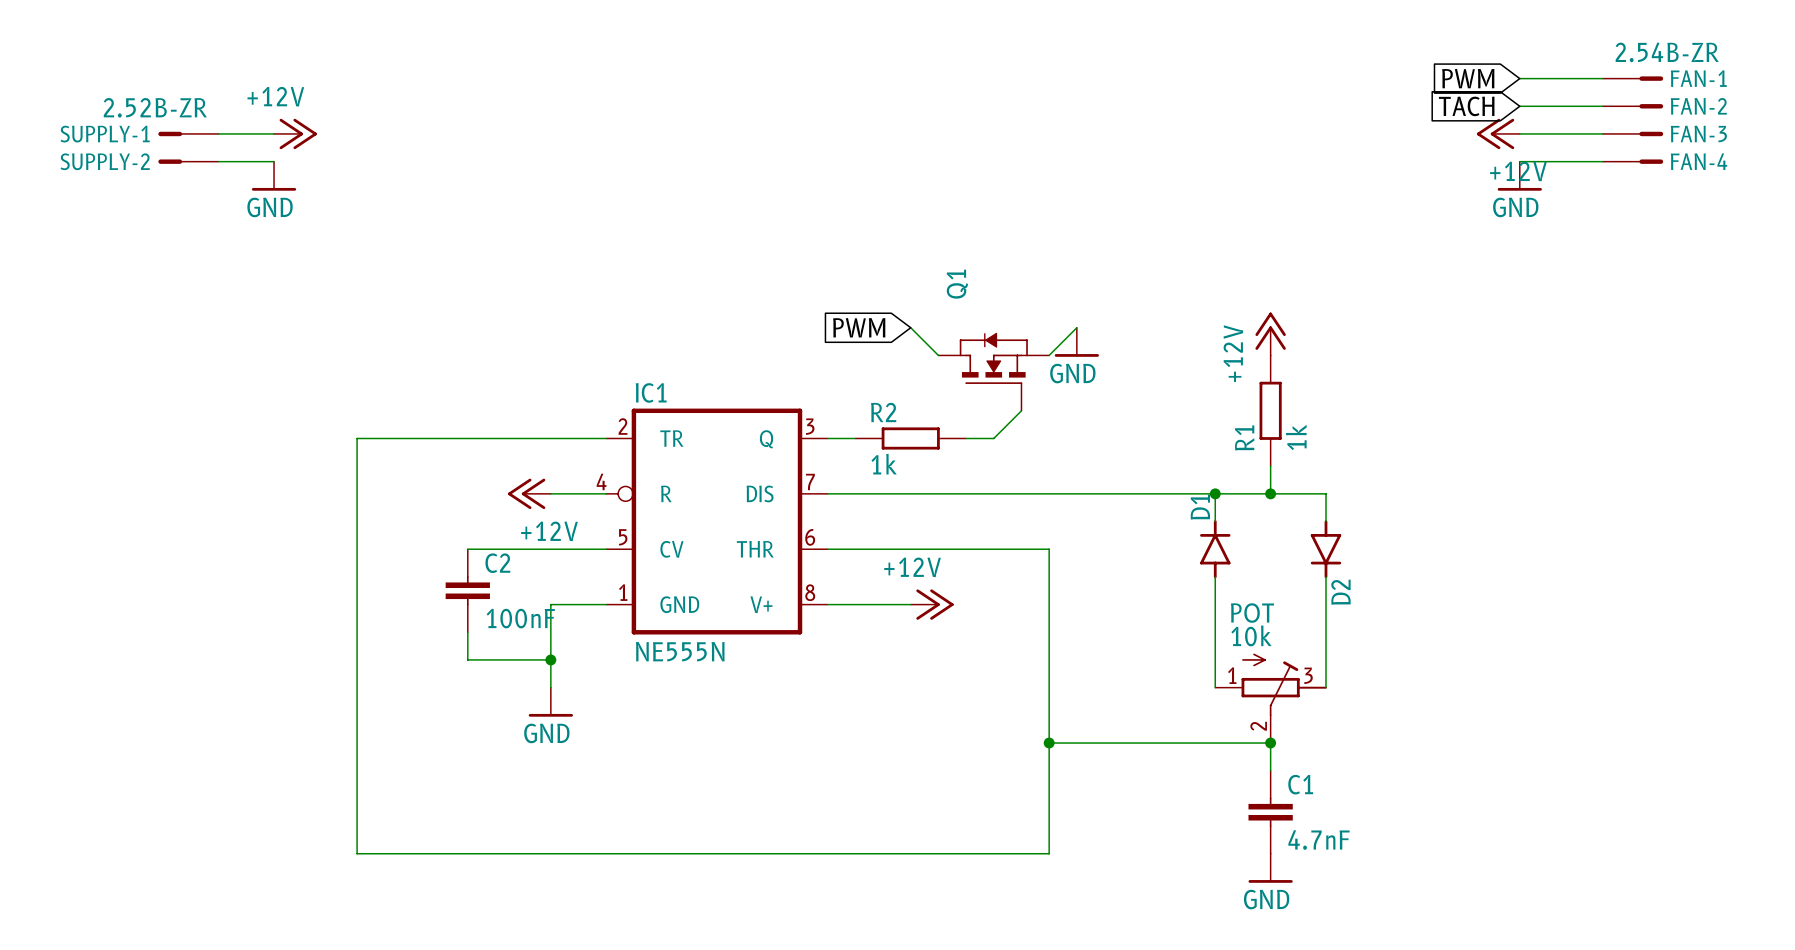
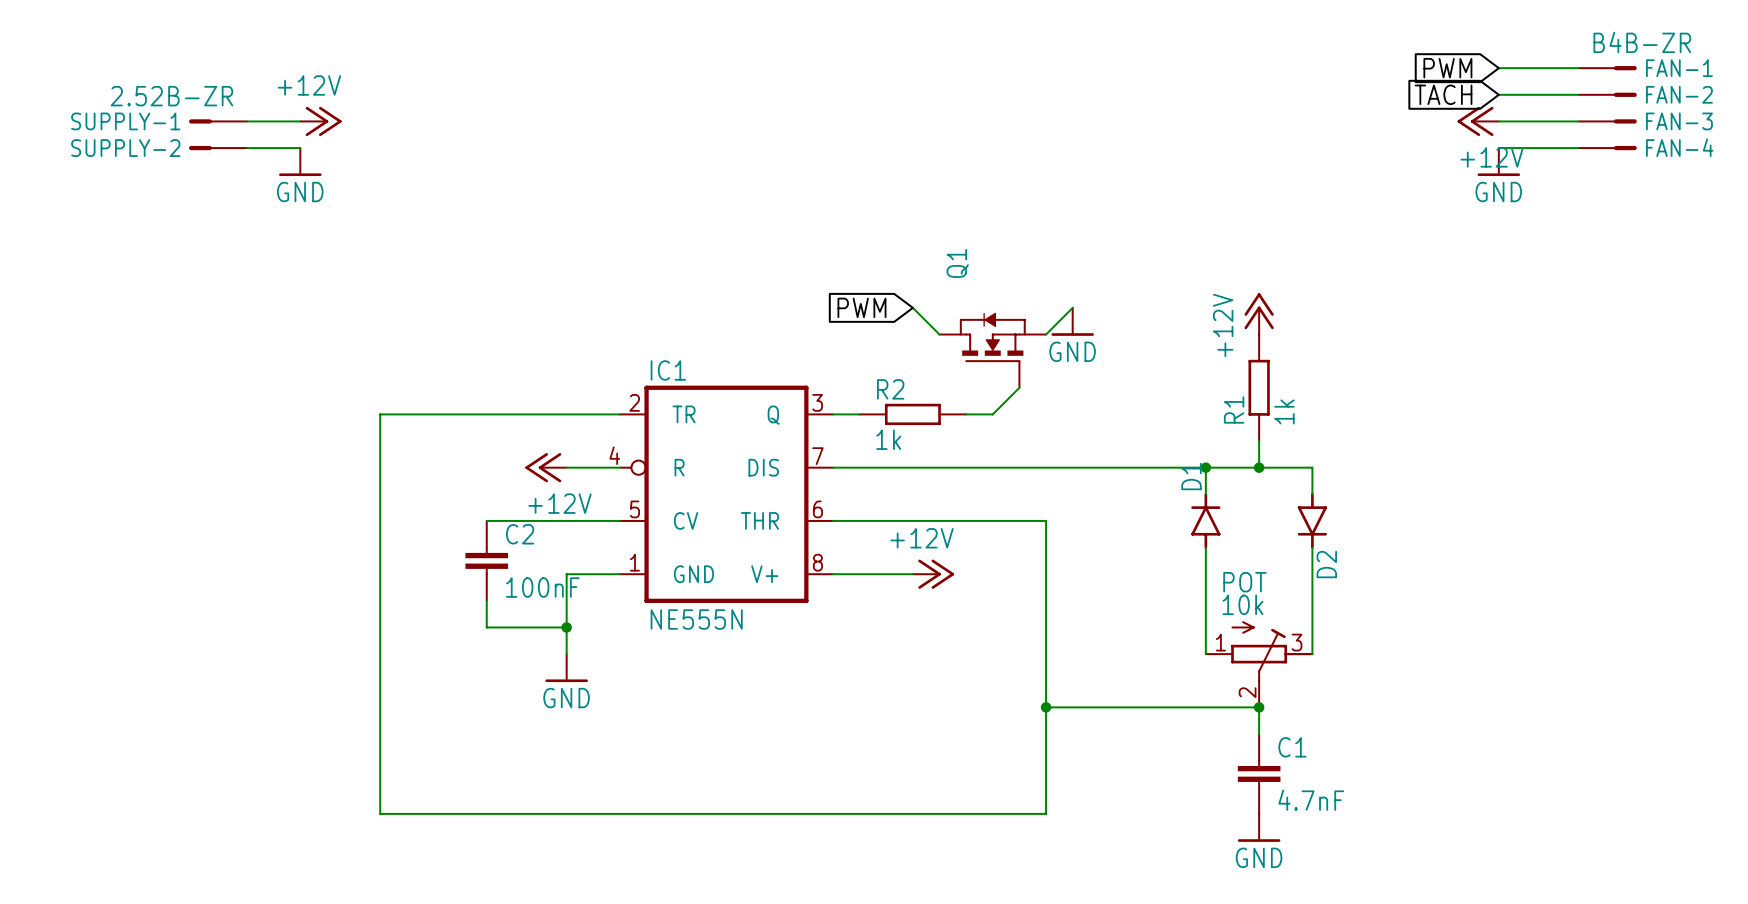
FAN-1 value: 2.54B-ZR (1667, 52) -> B4B-ZR (1642, 42)

